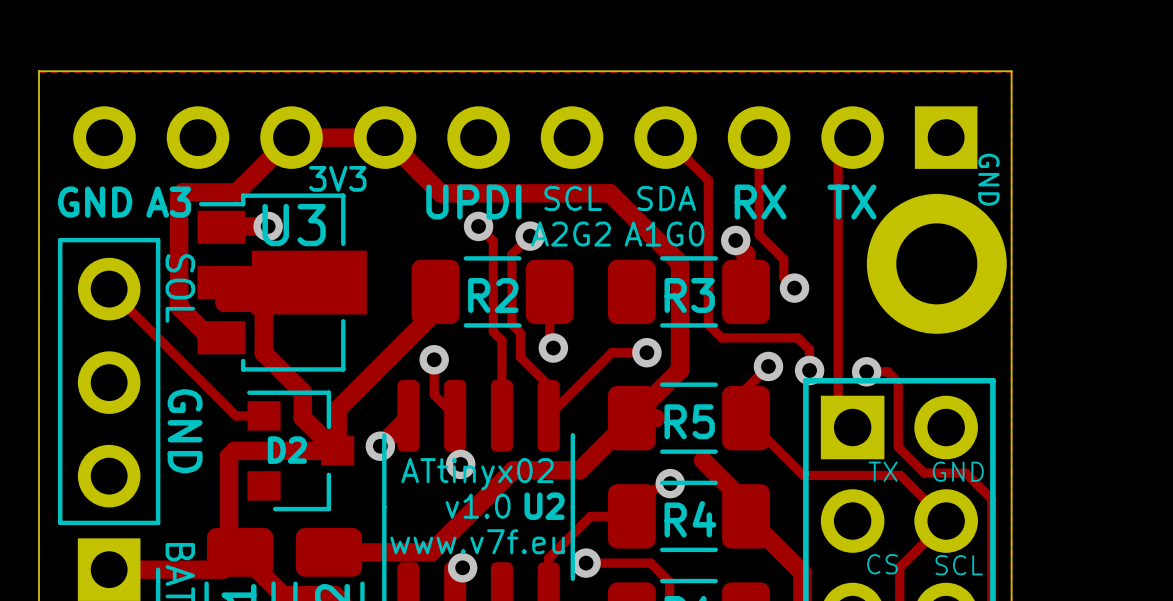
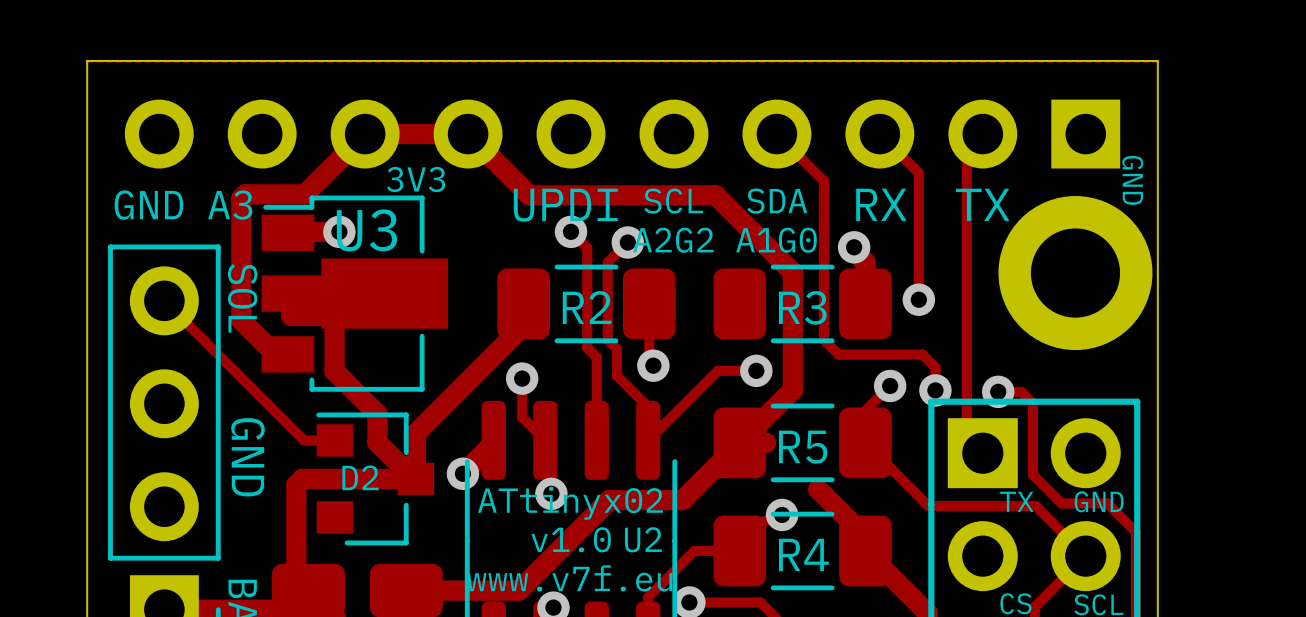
track: (759, 137) (759, 234) (783, 259) (783, 277) (794, 288) -> (879, 134) (918, 173) (918, 299)

